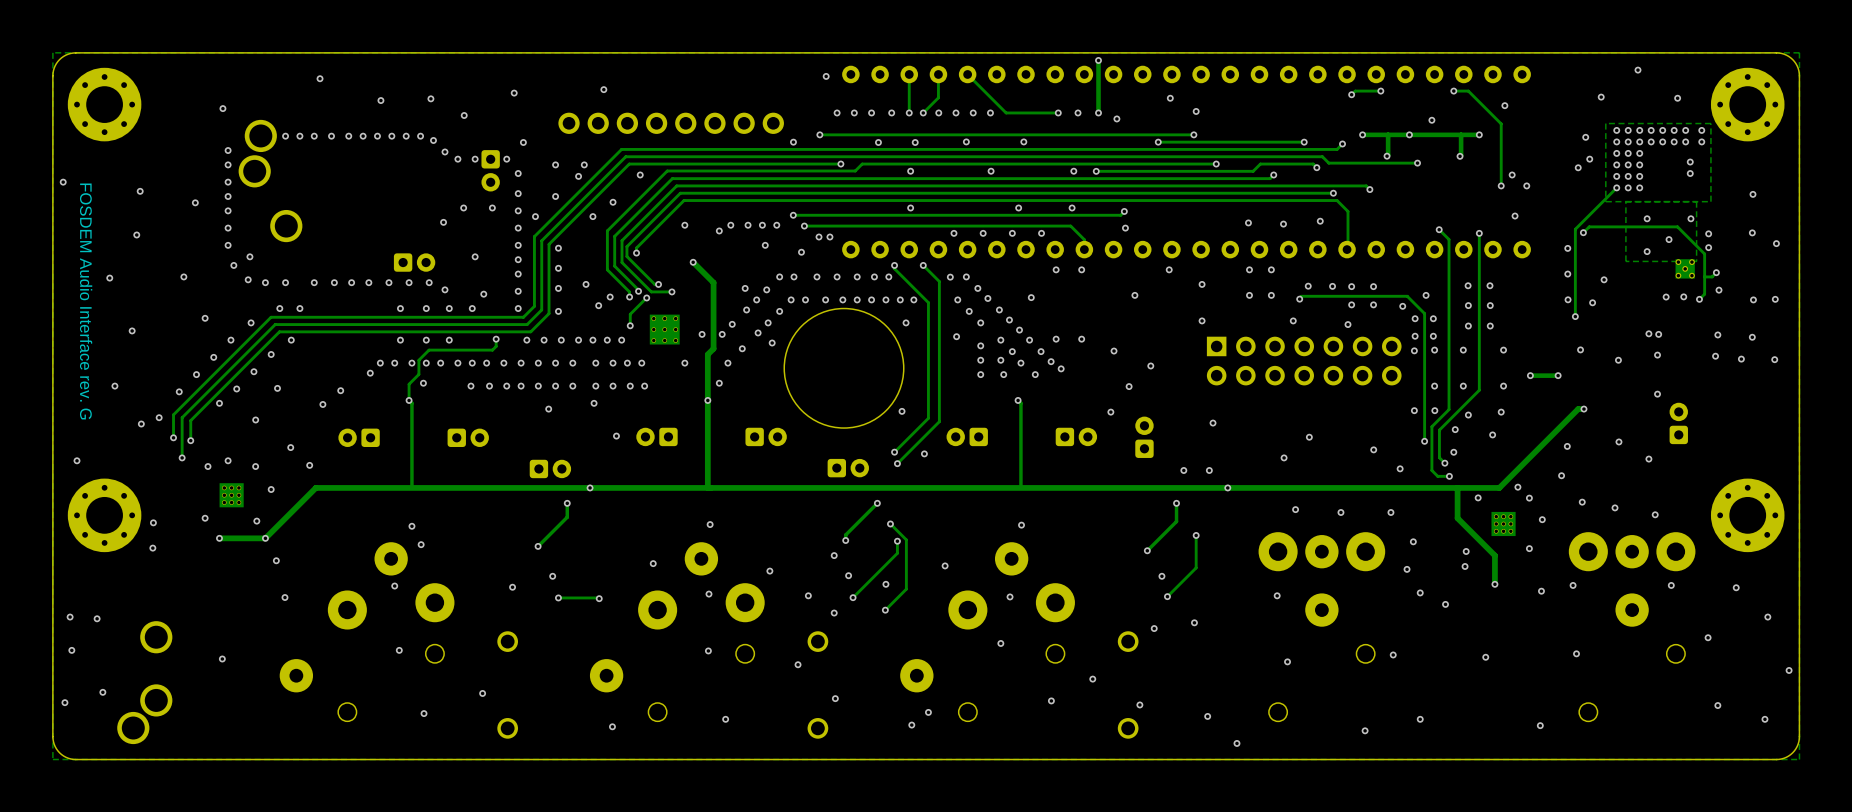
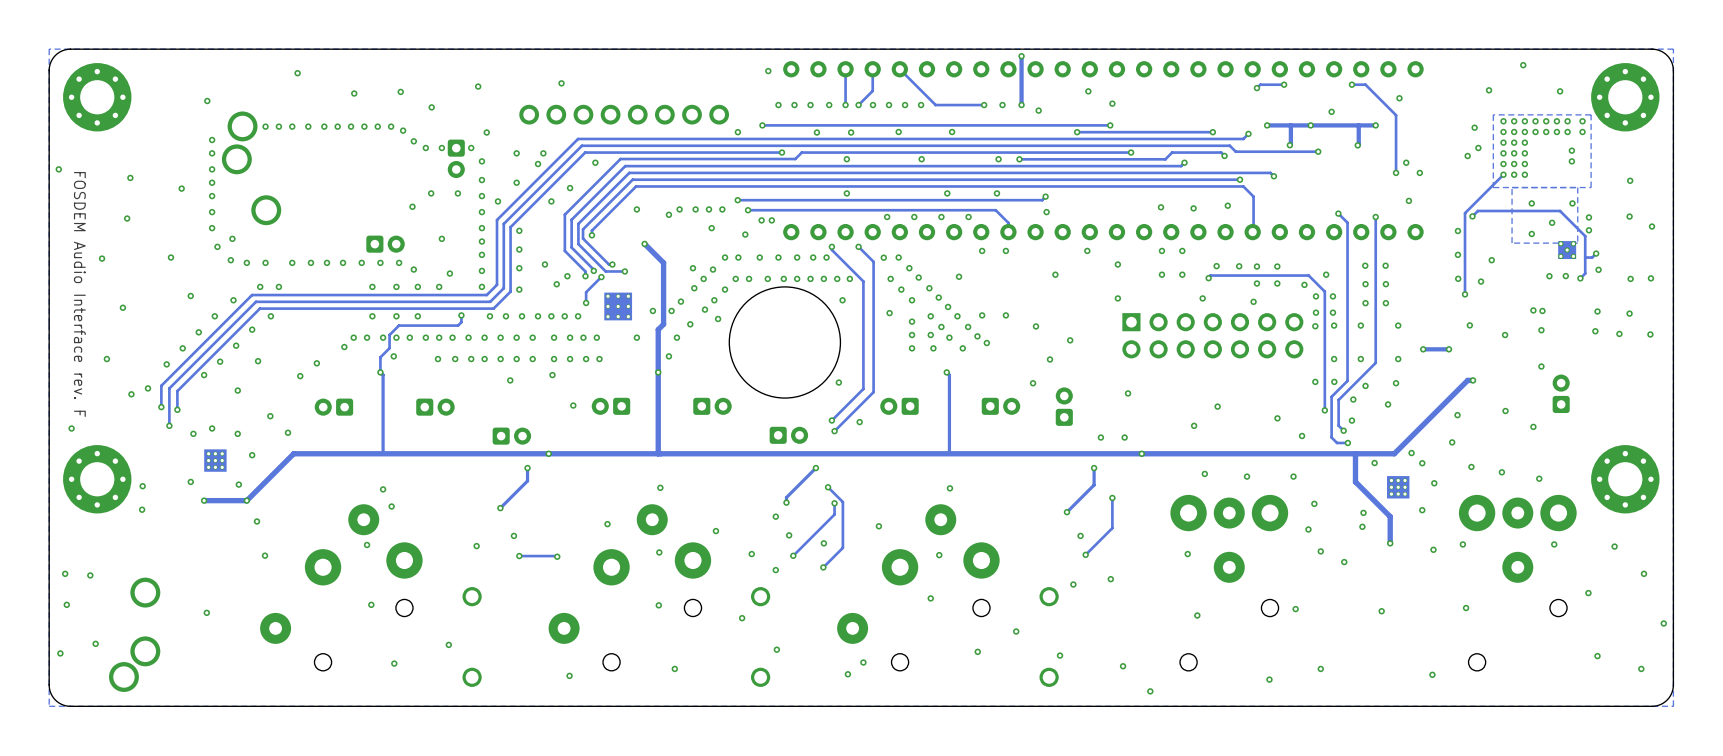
text: FOSDEM Audio Interface rev. G (86, 301) -> FOSDEM Audio Interface rev. F (79, 294)

